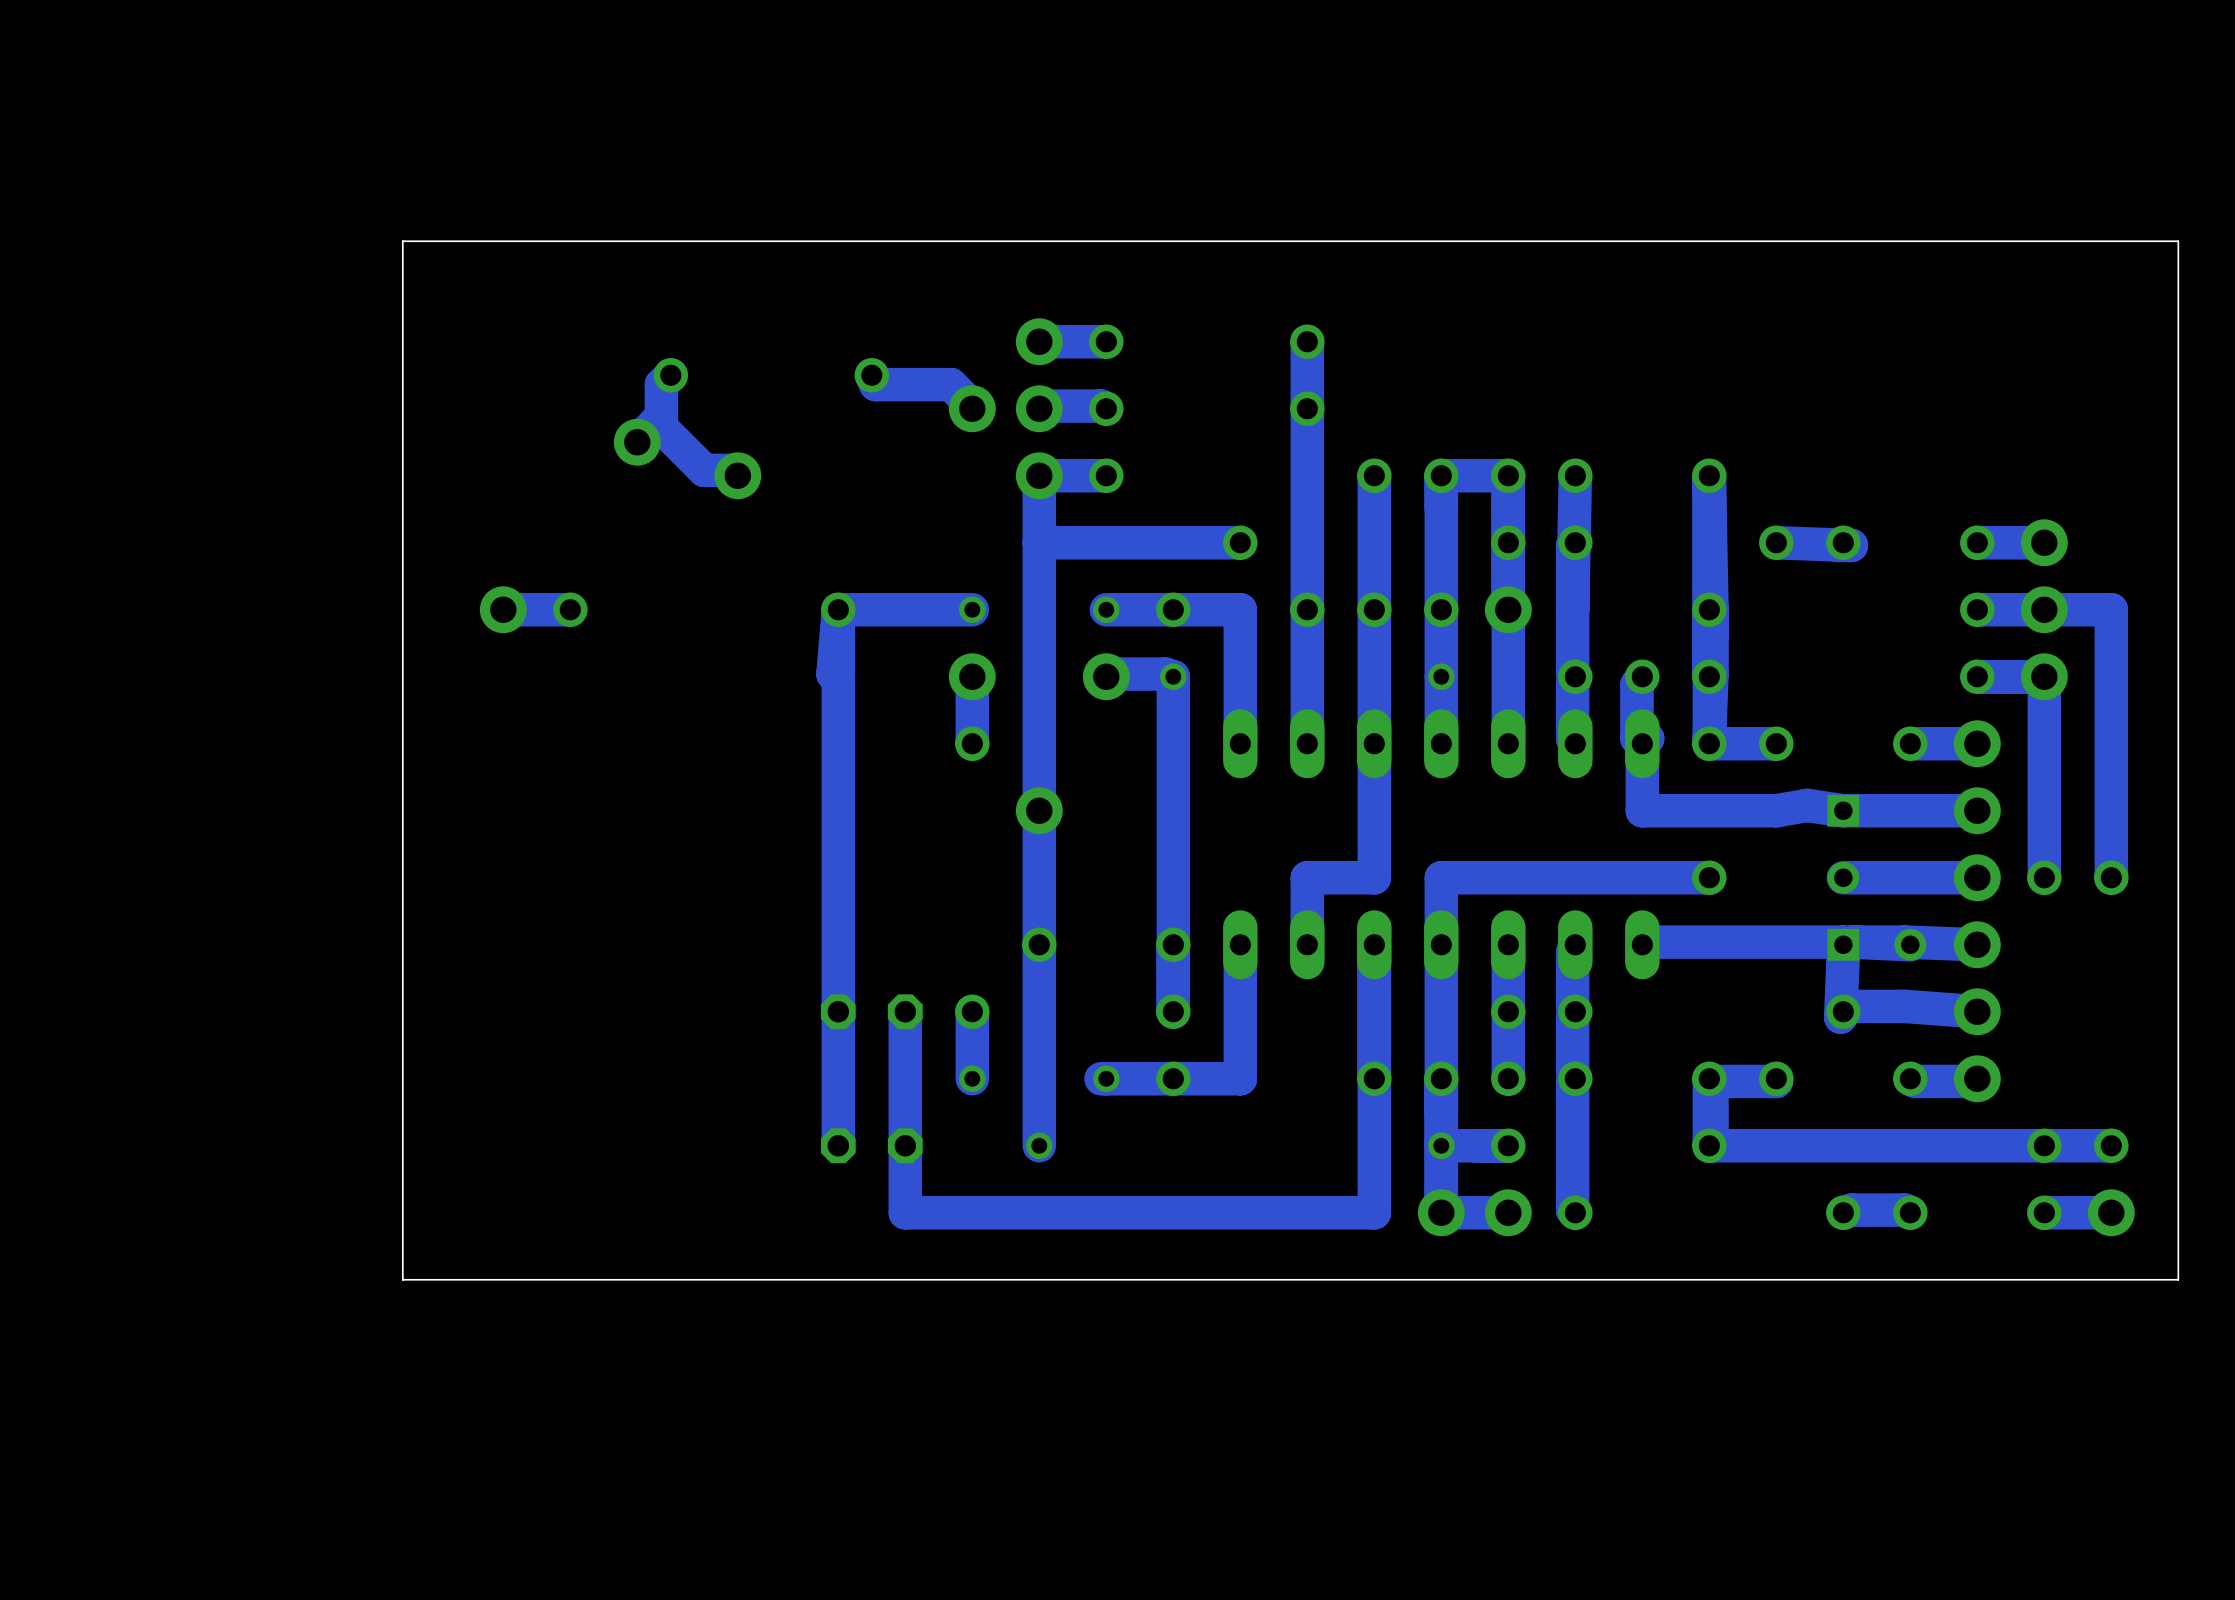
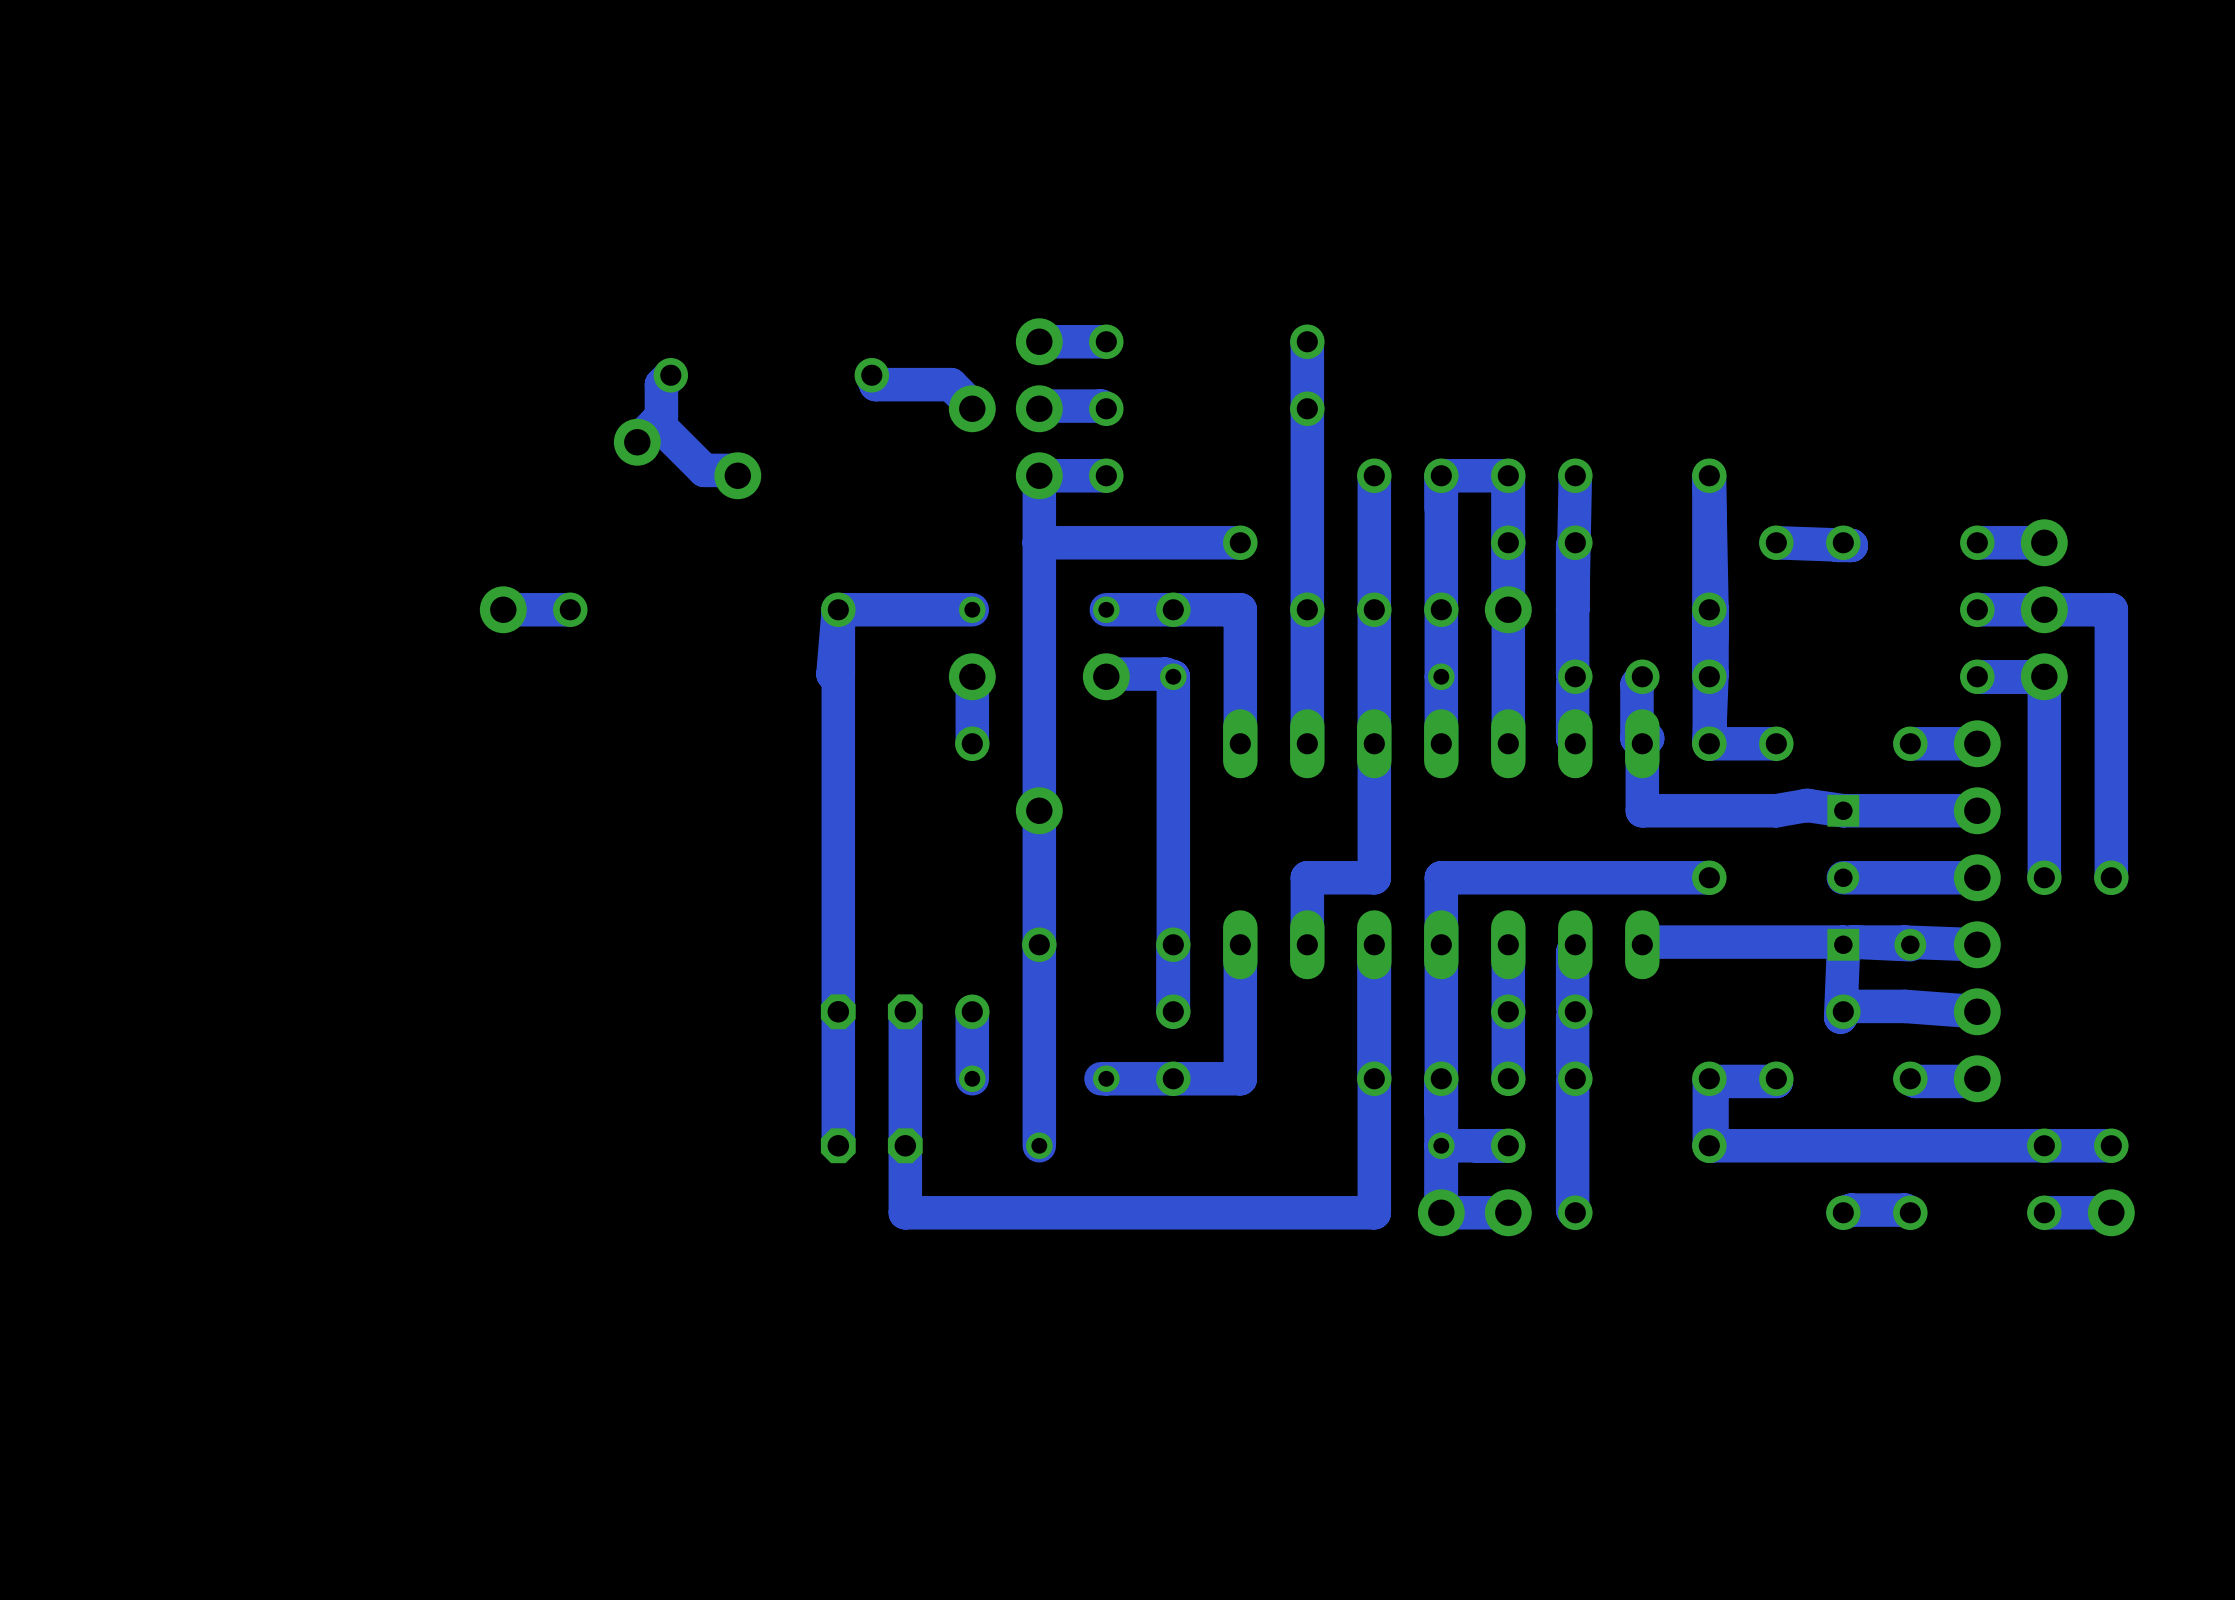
board edge: (2178, 241) (402, 241) (402, 1279) (2178, 1279) (2178, 241) -> none

